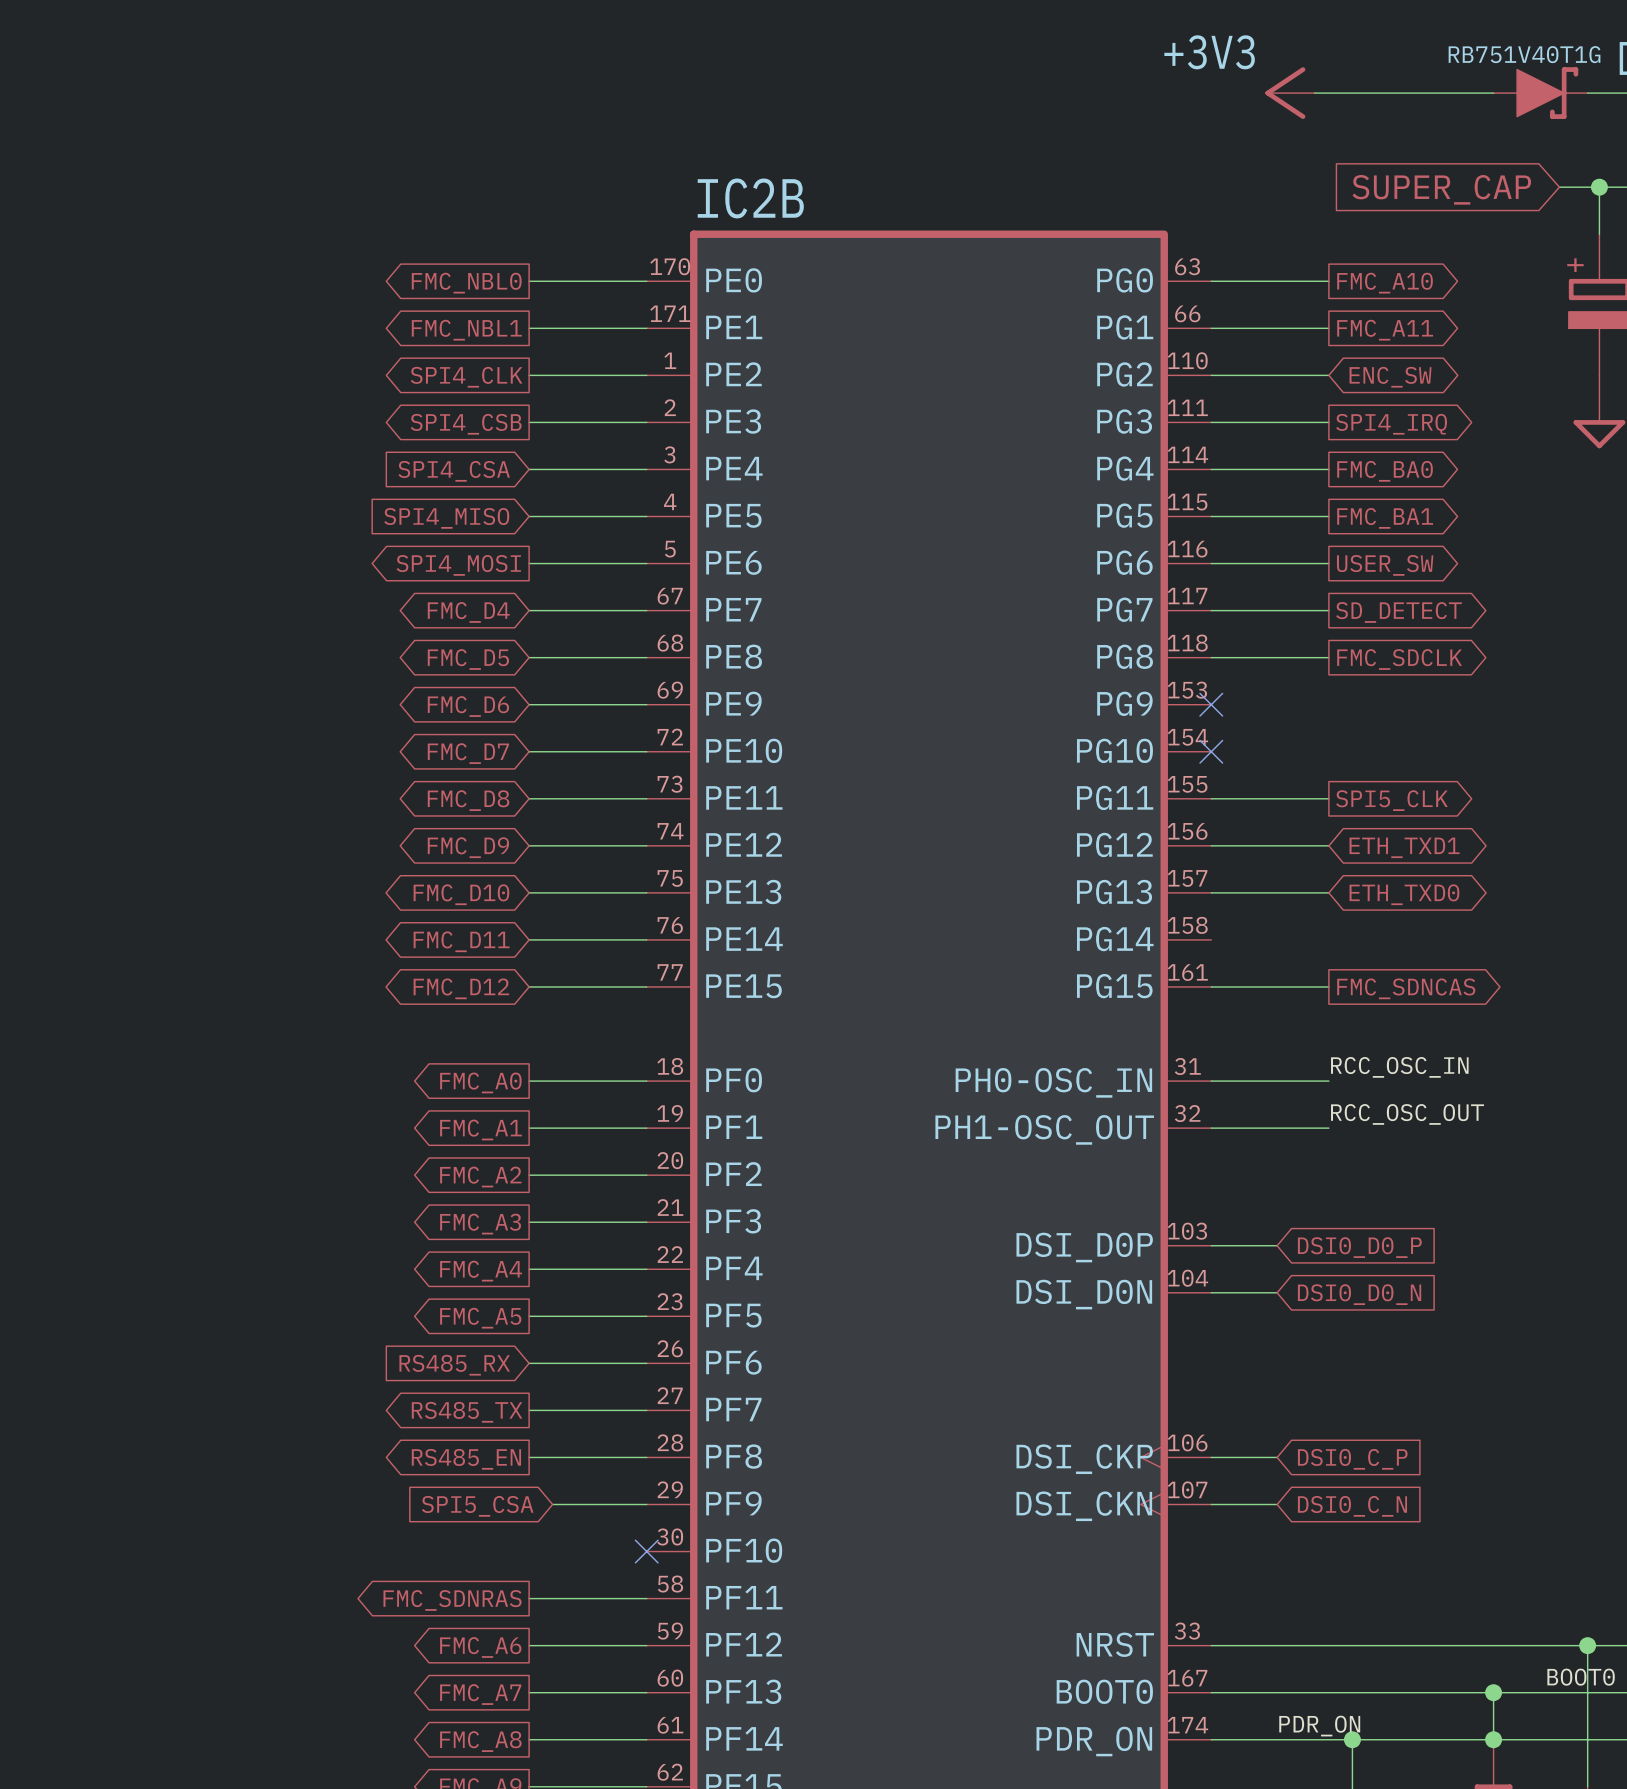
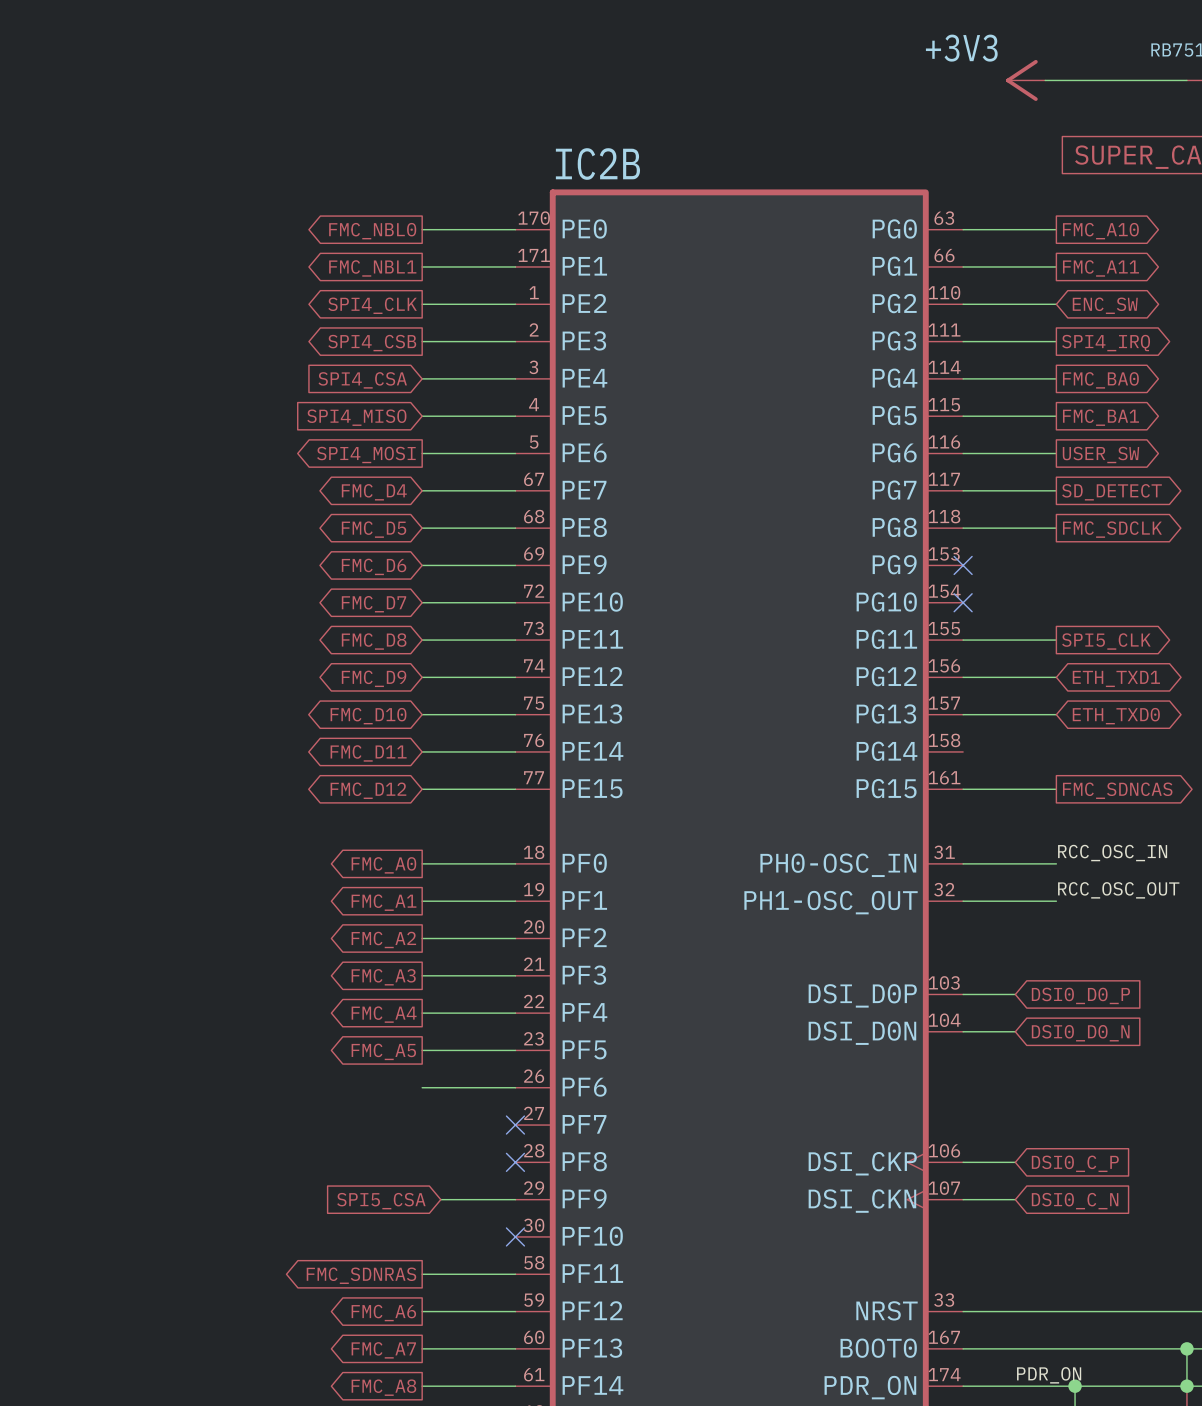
global label: RS485_RX (454, 1365) -> none
wire: (529, 1410) (646, 1410) -> none
no-connect mark: none -> (515, 1125)
global label: RS485_TX (467, 1412) -> none
wire: (529, 1457) (646, 1457) -> none
no-connect mark: none -> (515, 1162)
global label: RS485_EN (466, 1459) -> none

